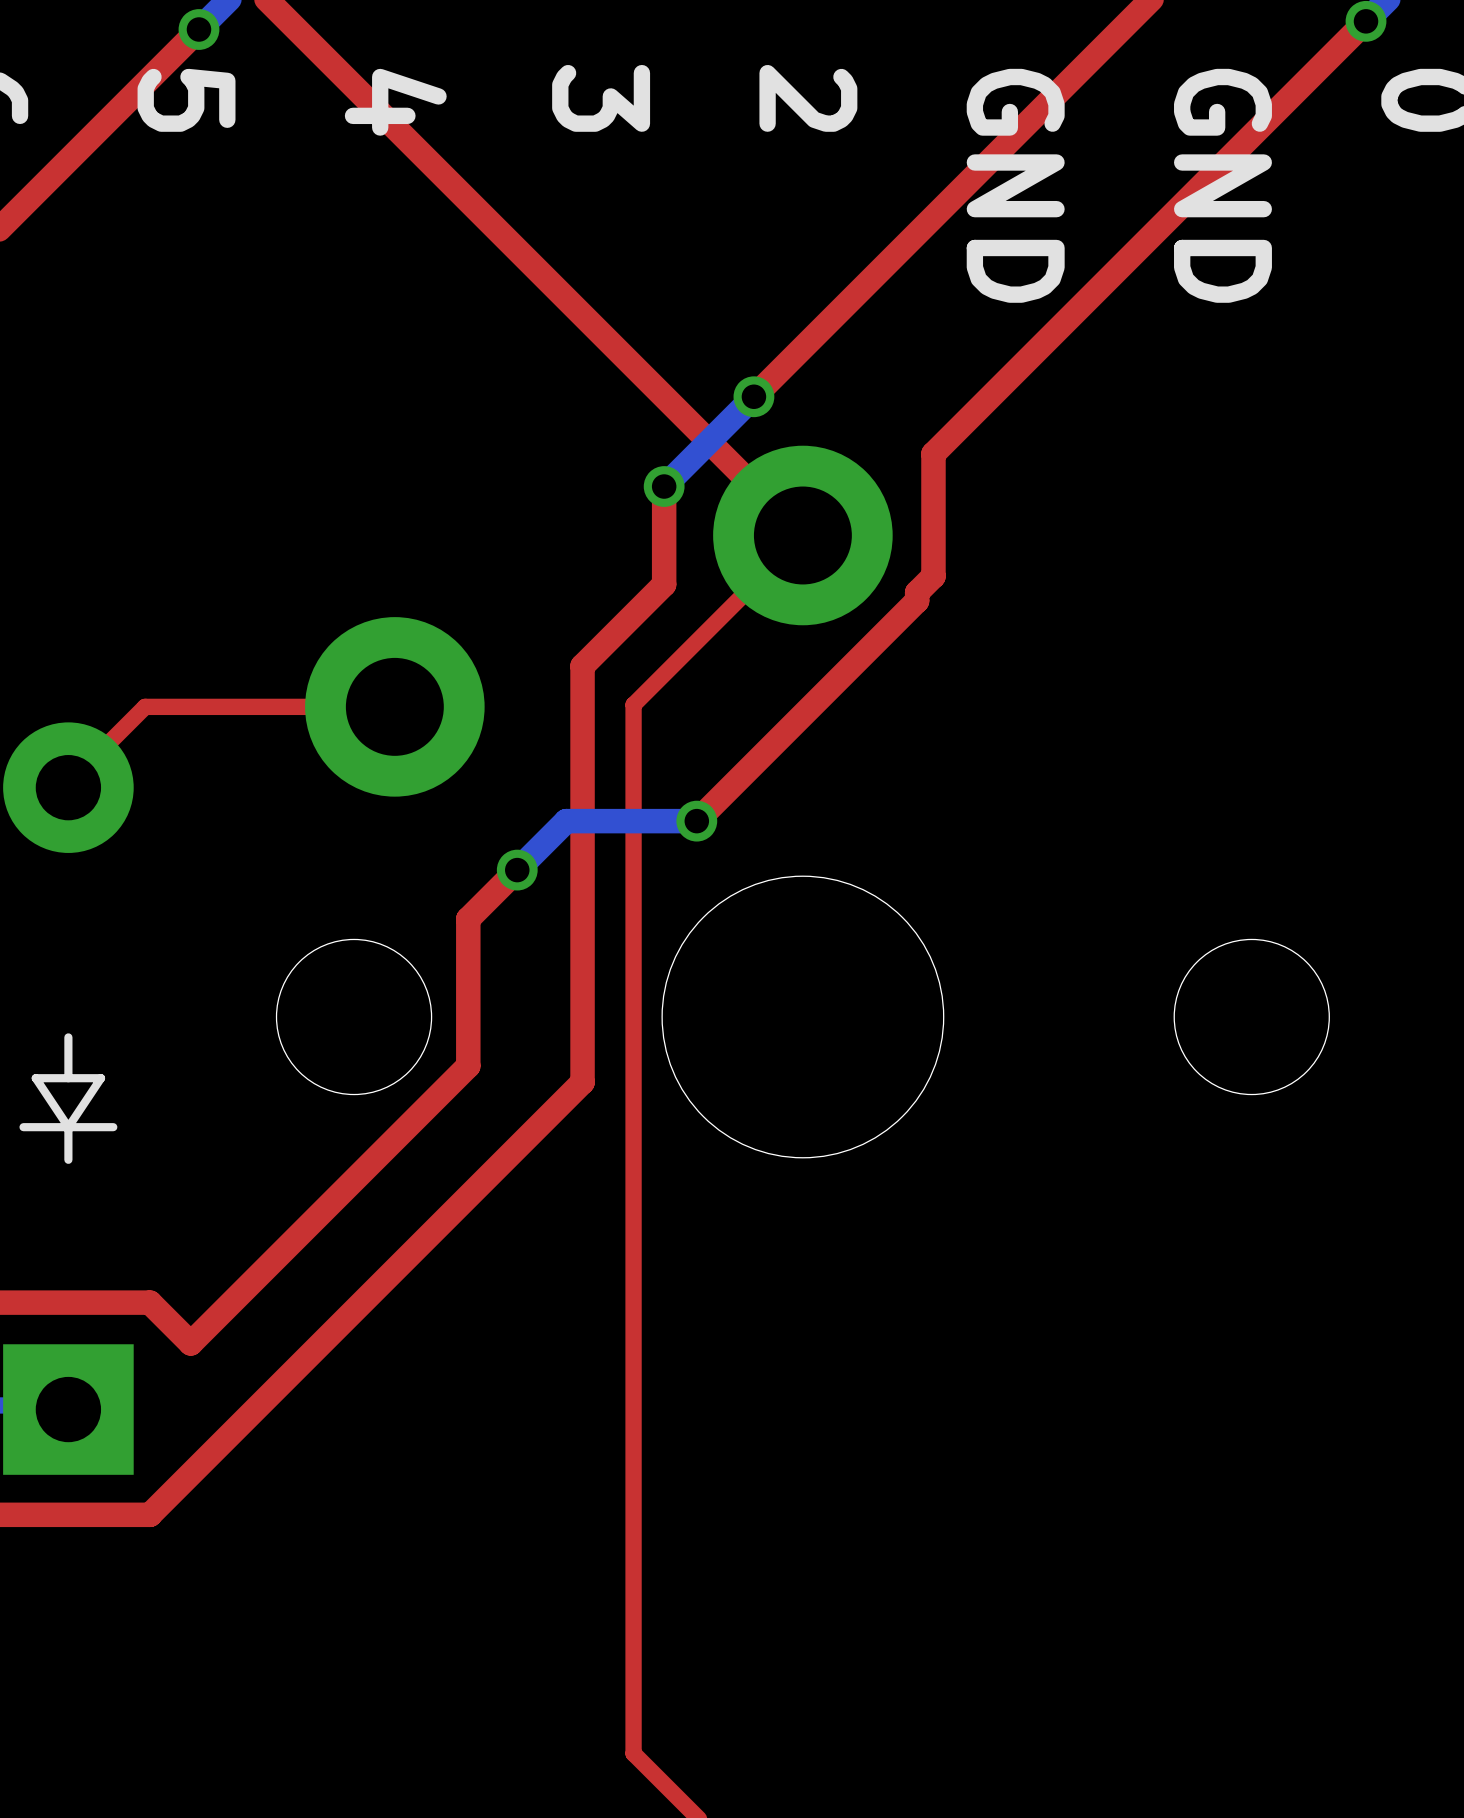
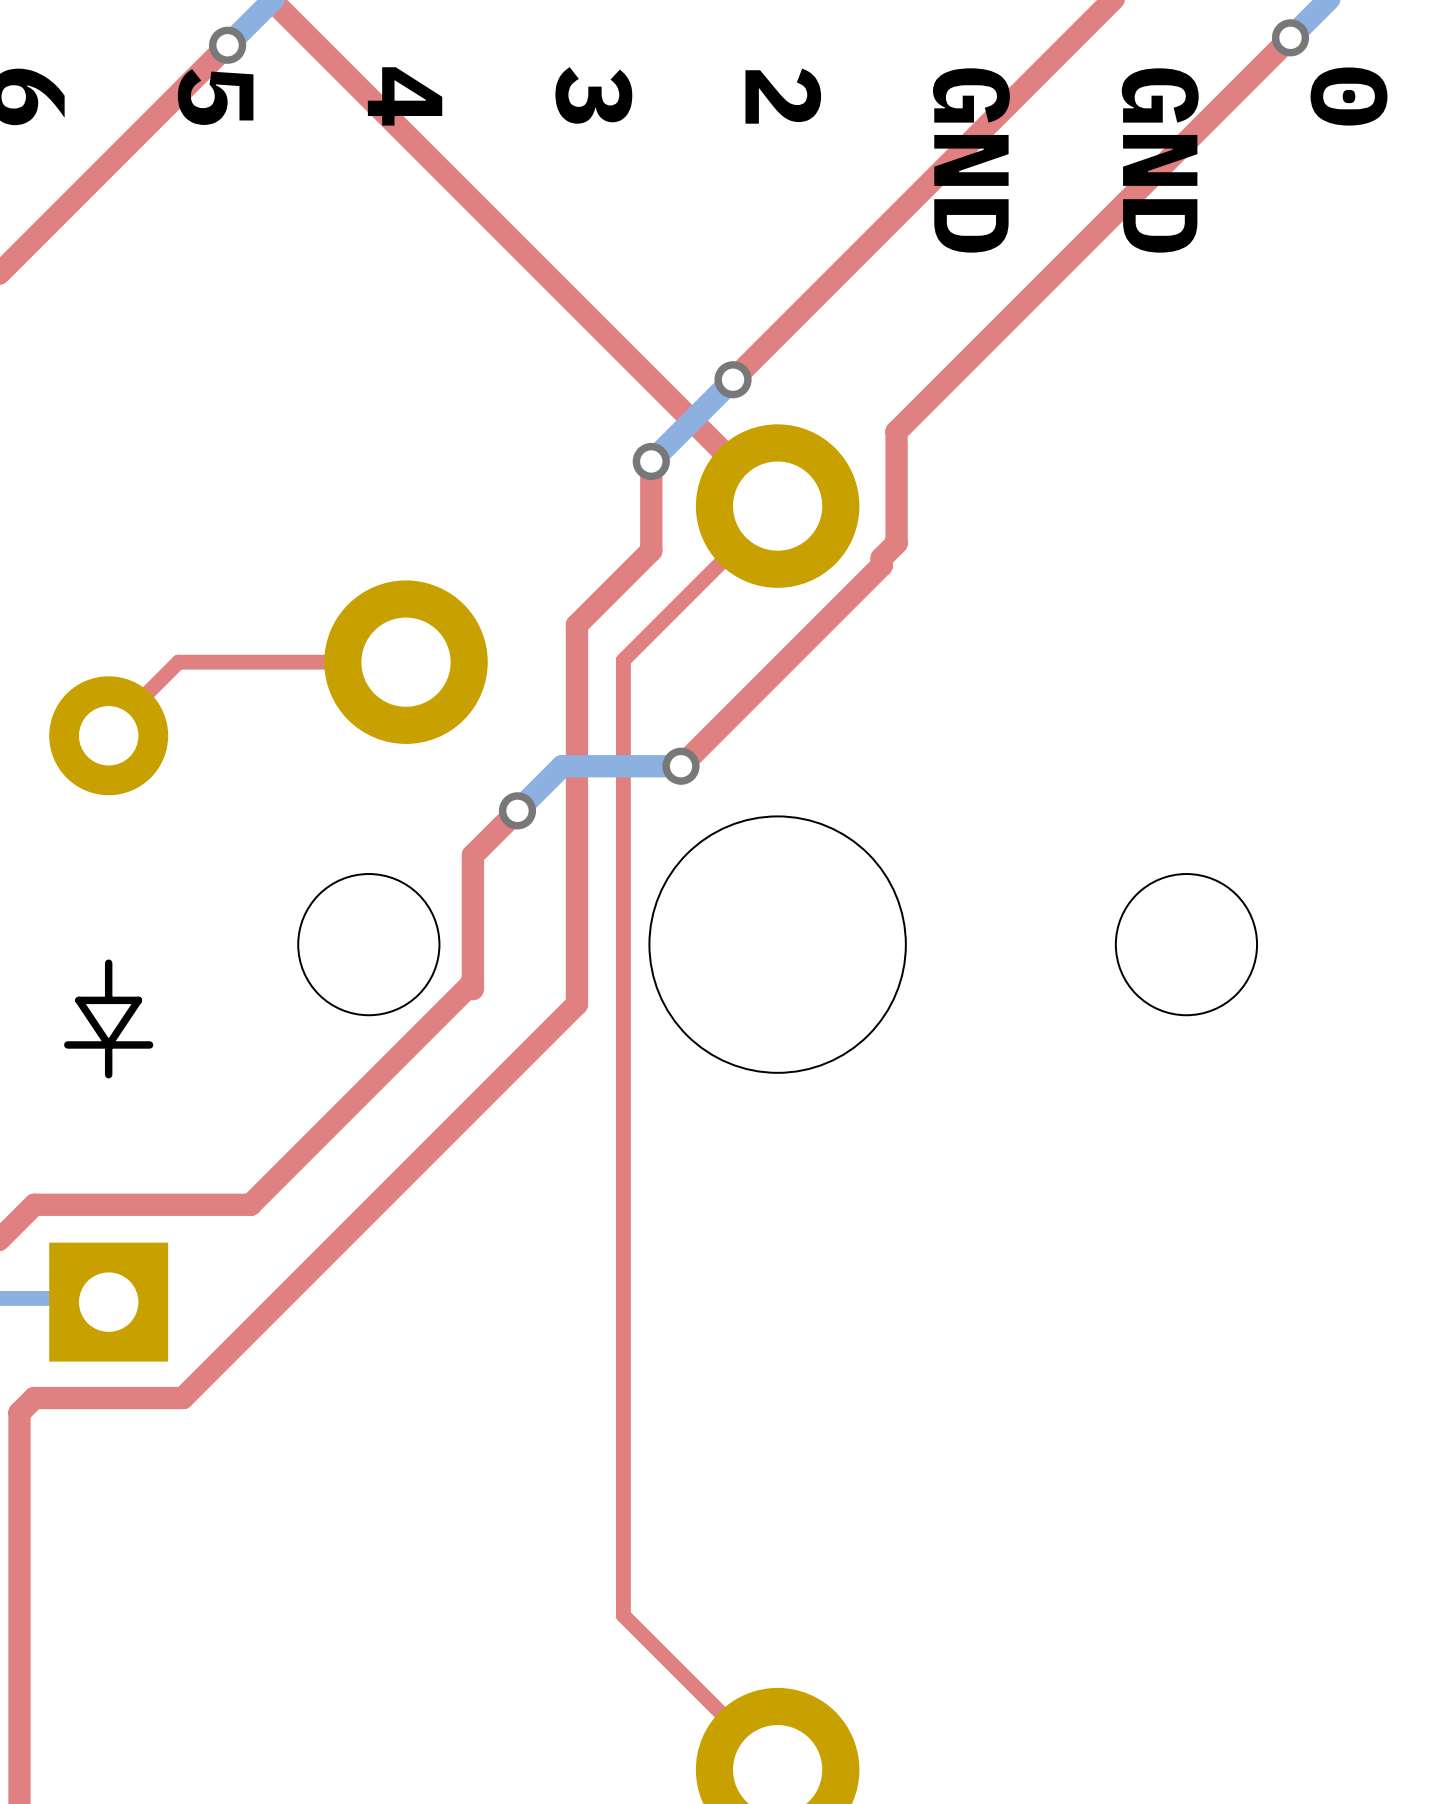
top track: (468, 1065) (190, 1343) (150, 1302) -> (472, 982) (250, 1204) (183, 1204)

